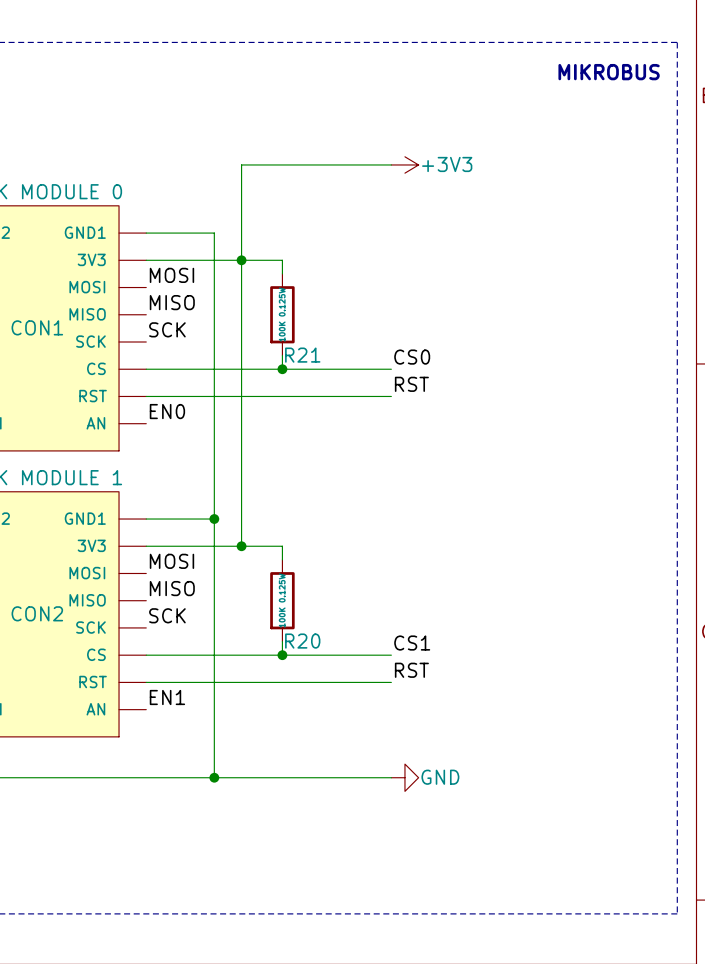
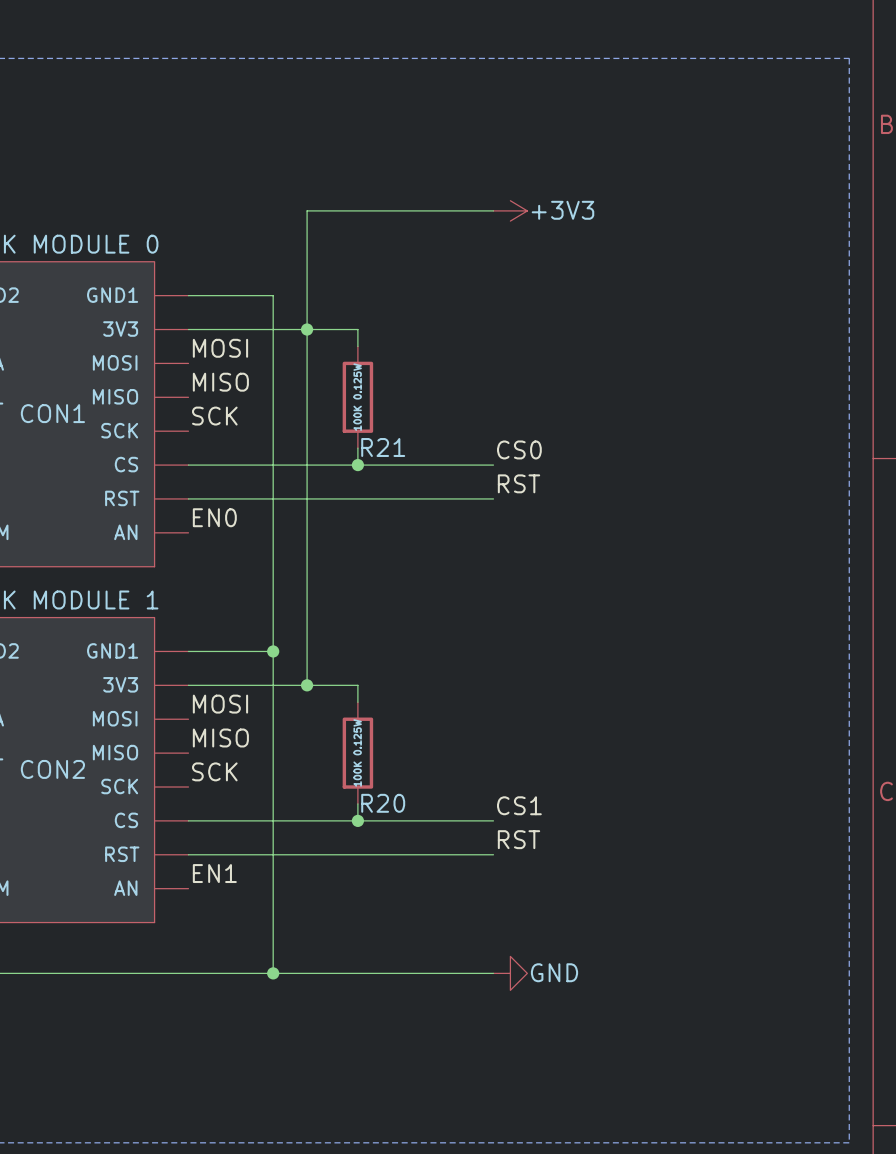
text: MIKROBUS (609, 72) -> none

